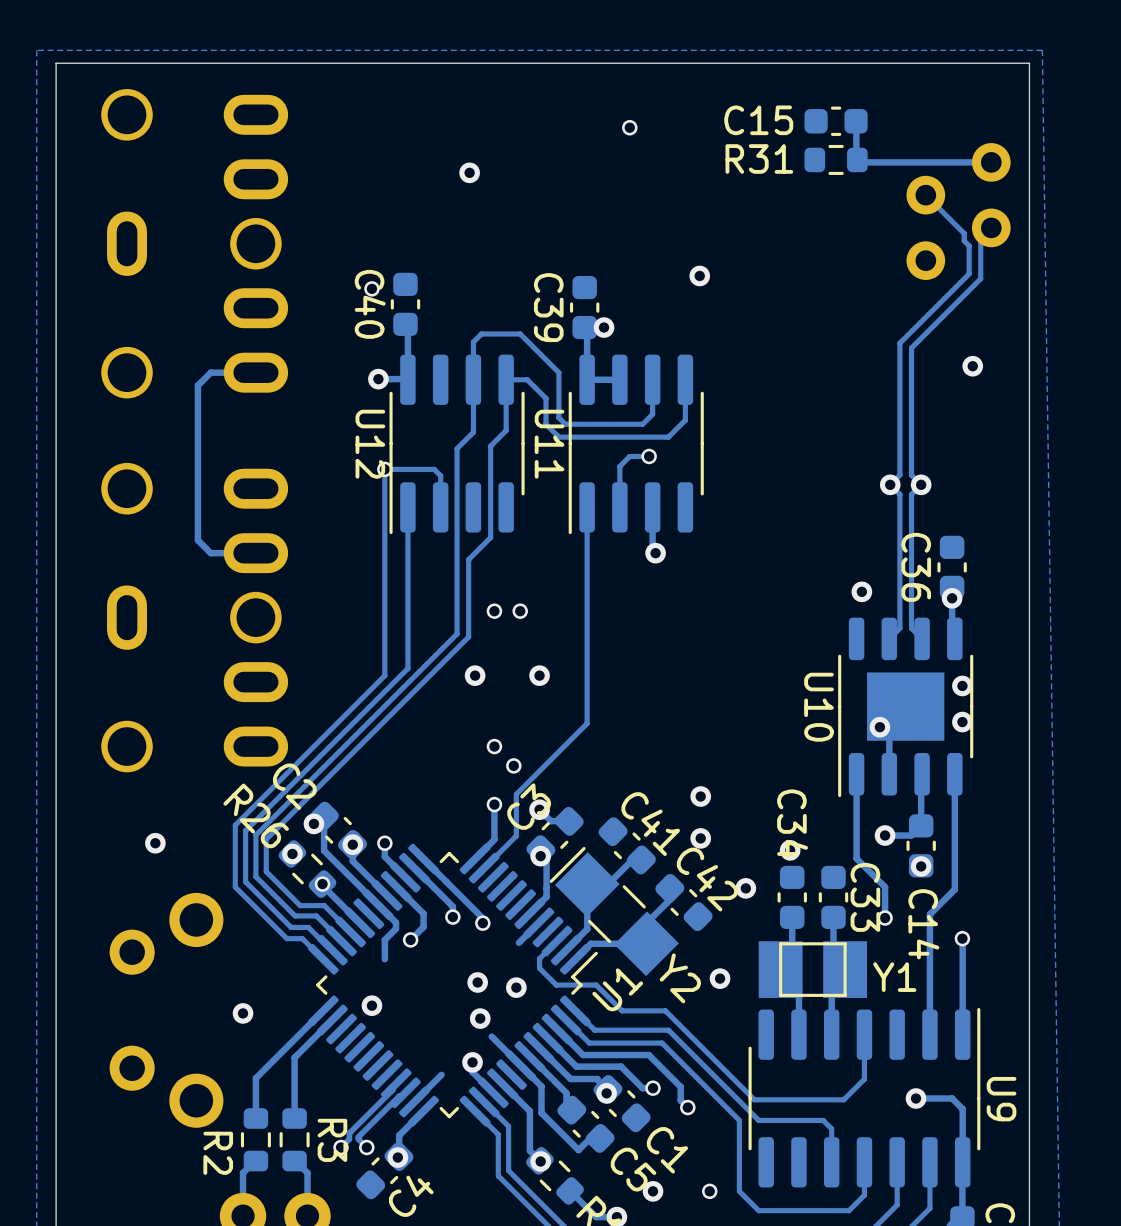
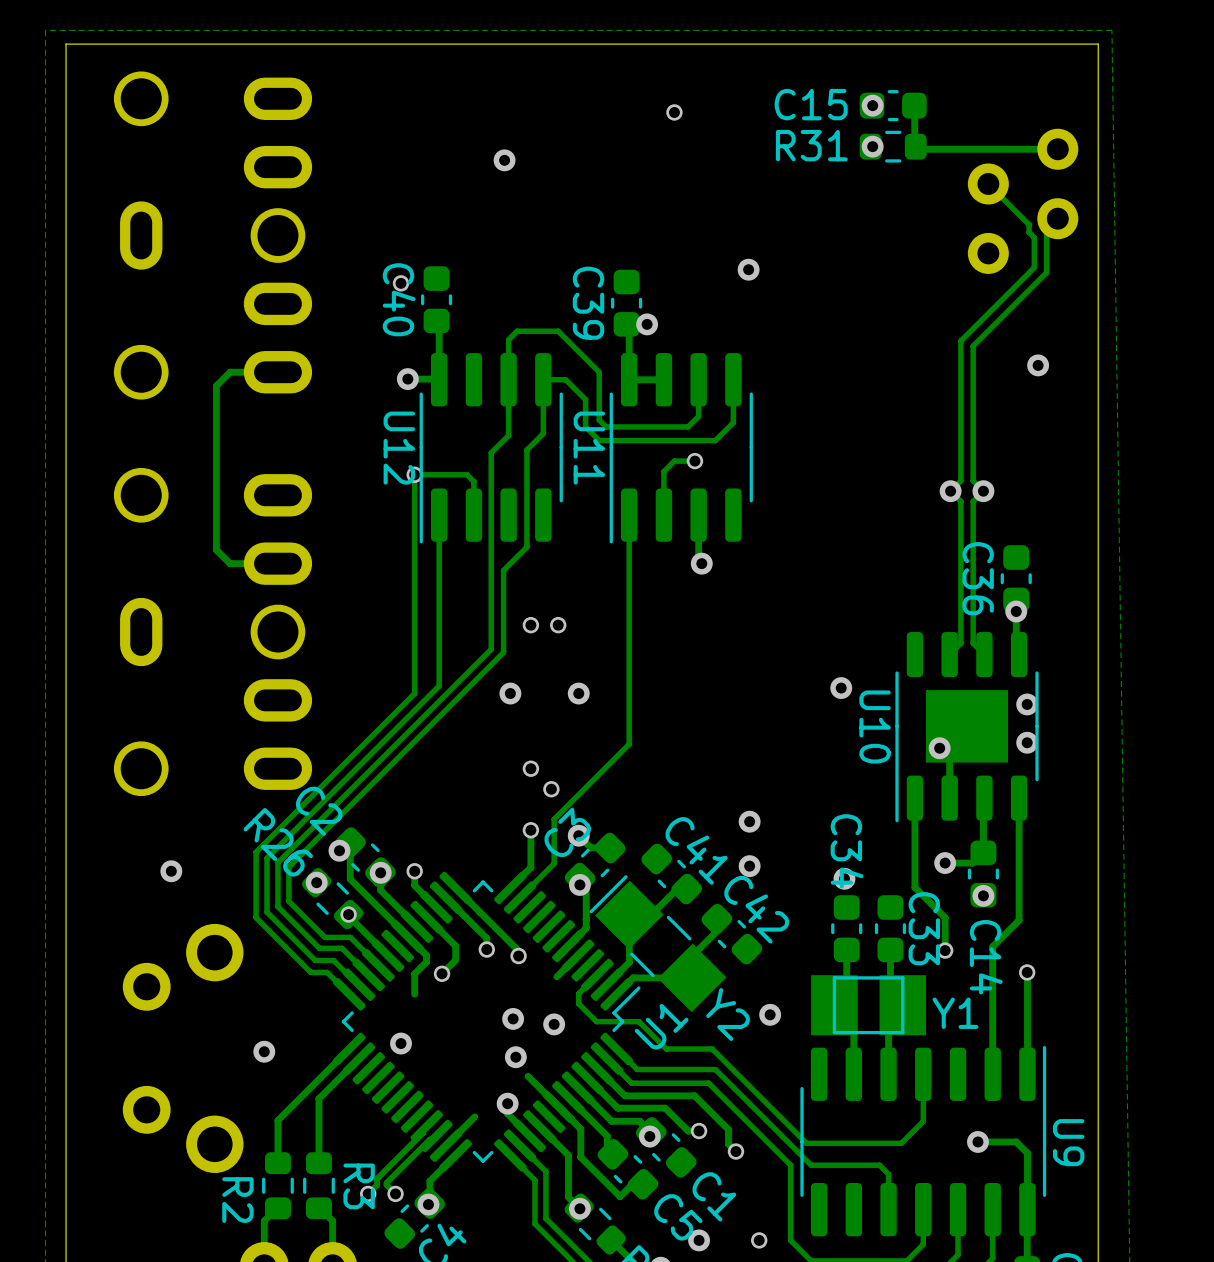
via: none -> (872, 105)
via: none -> (872, 146)
via position: (861, 591) -> (841, 688)
via: (745, 888) -> none

